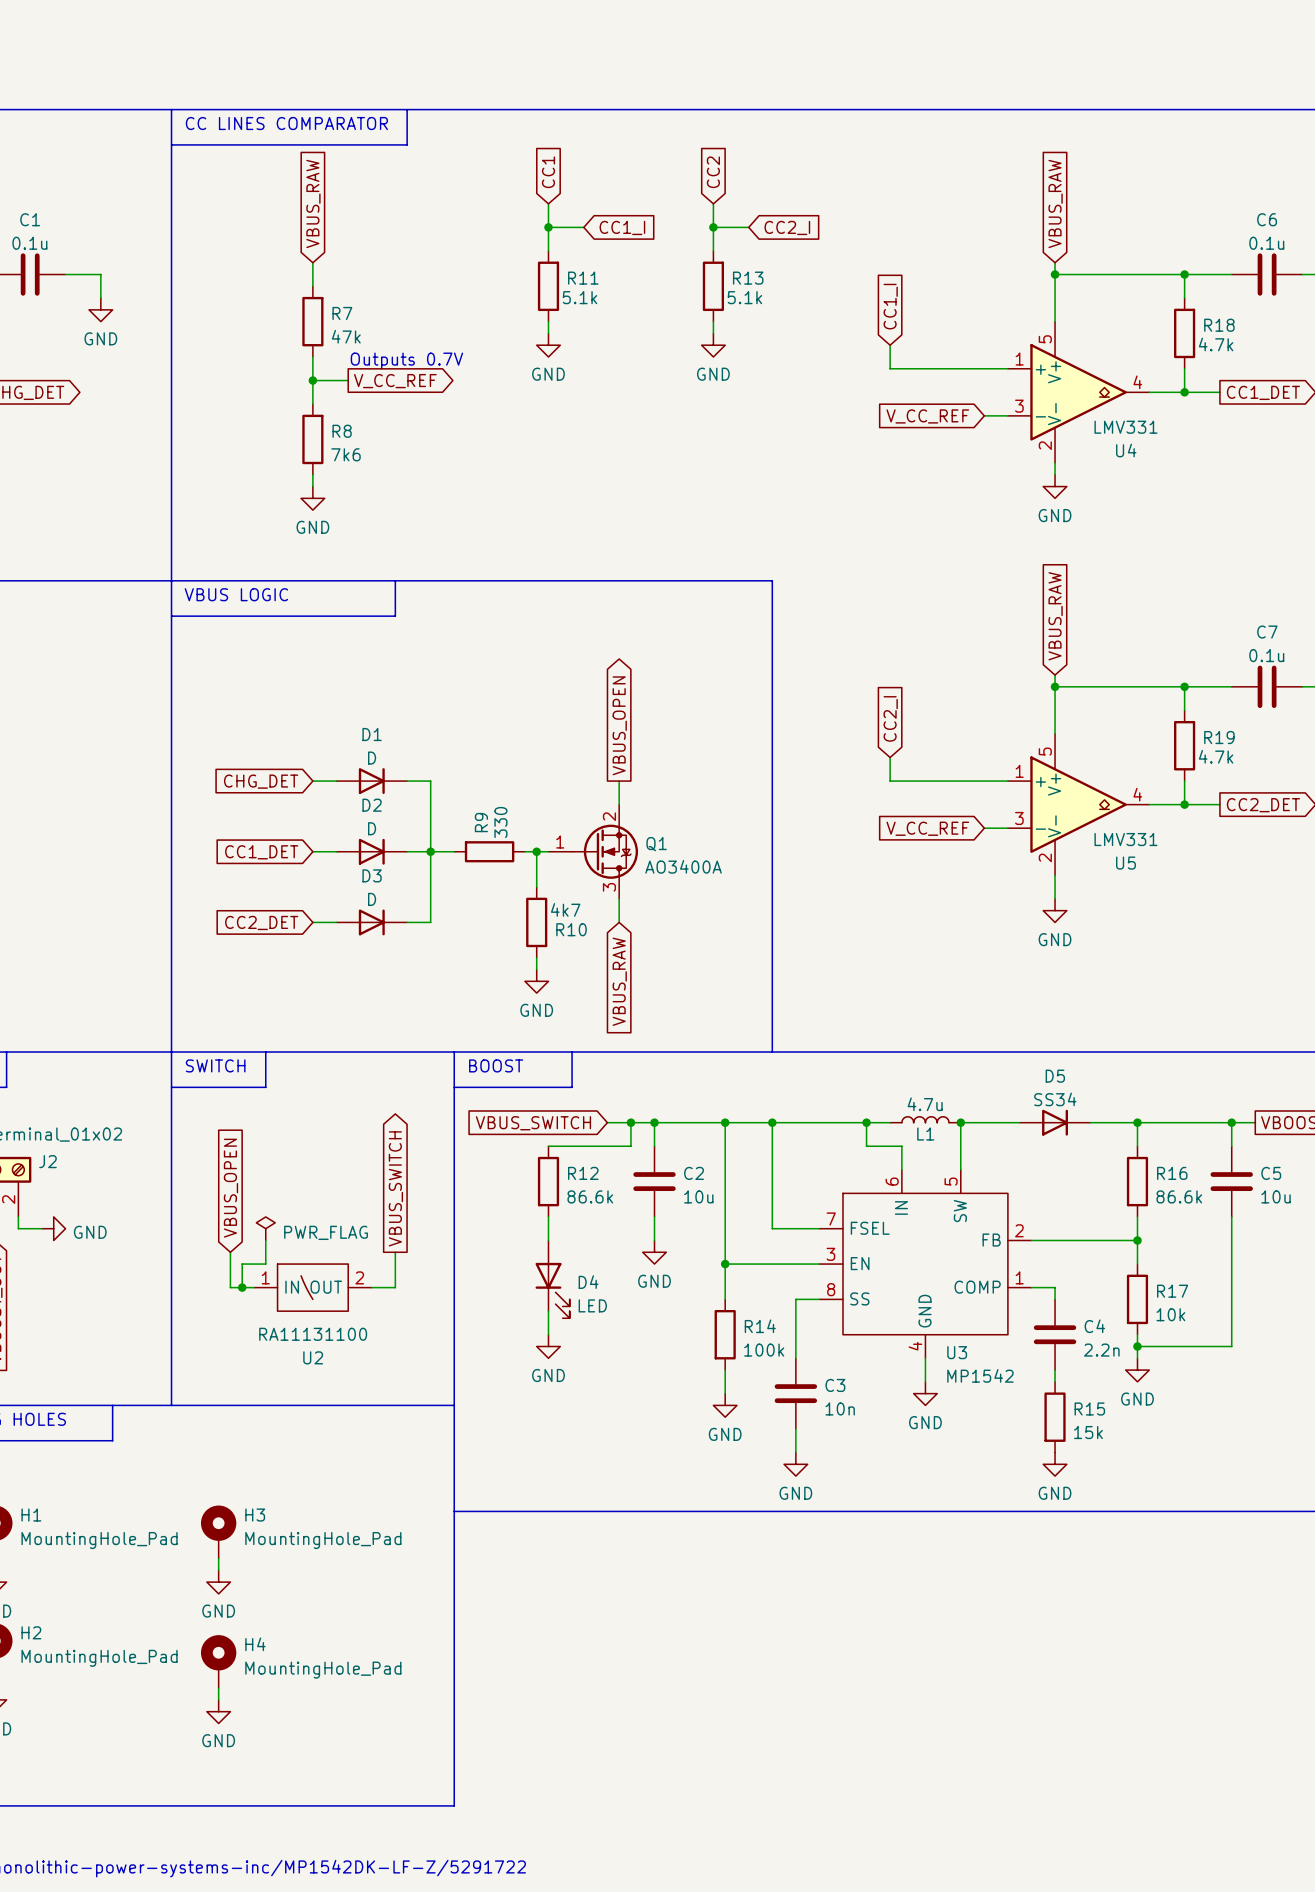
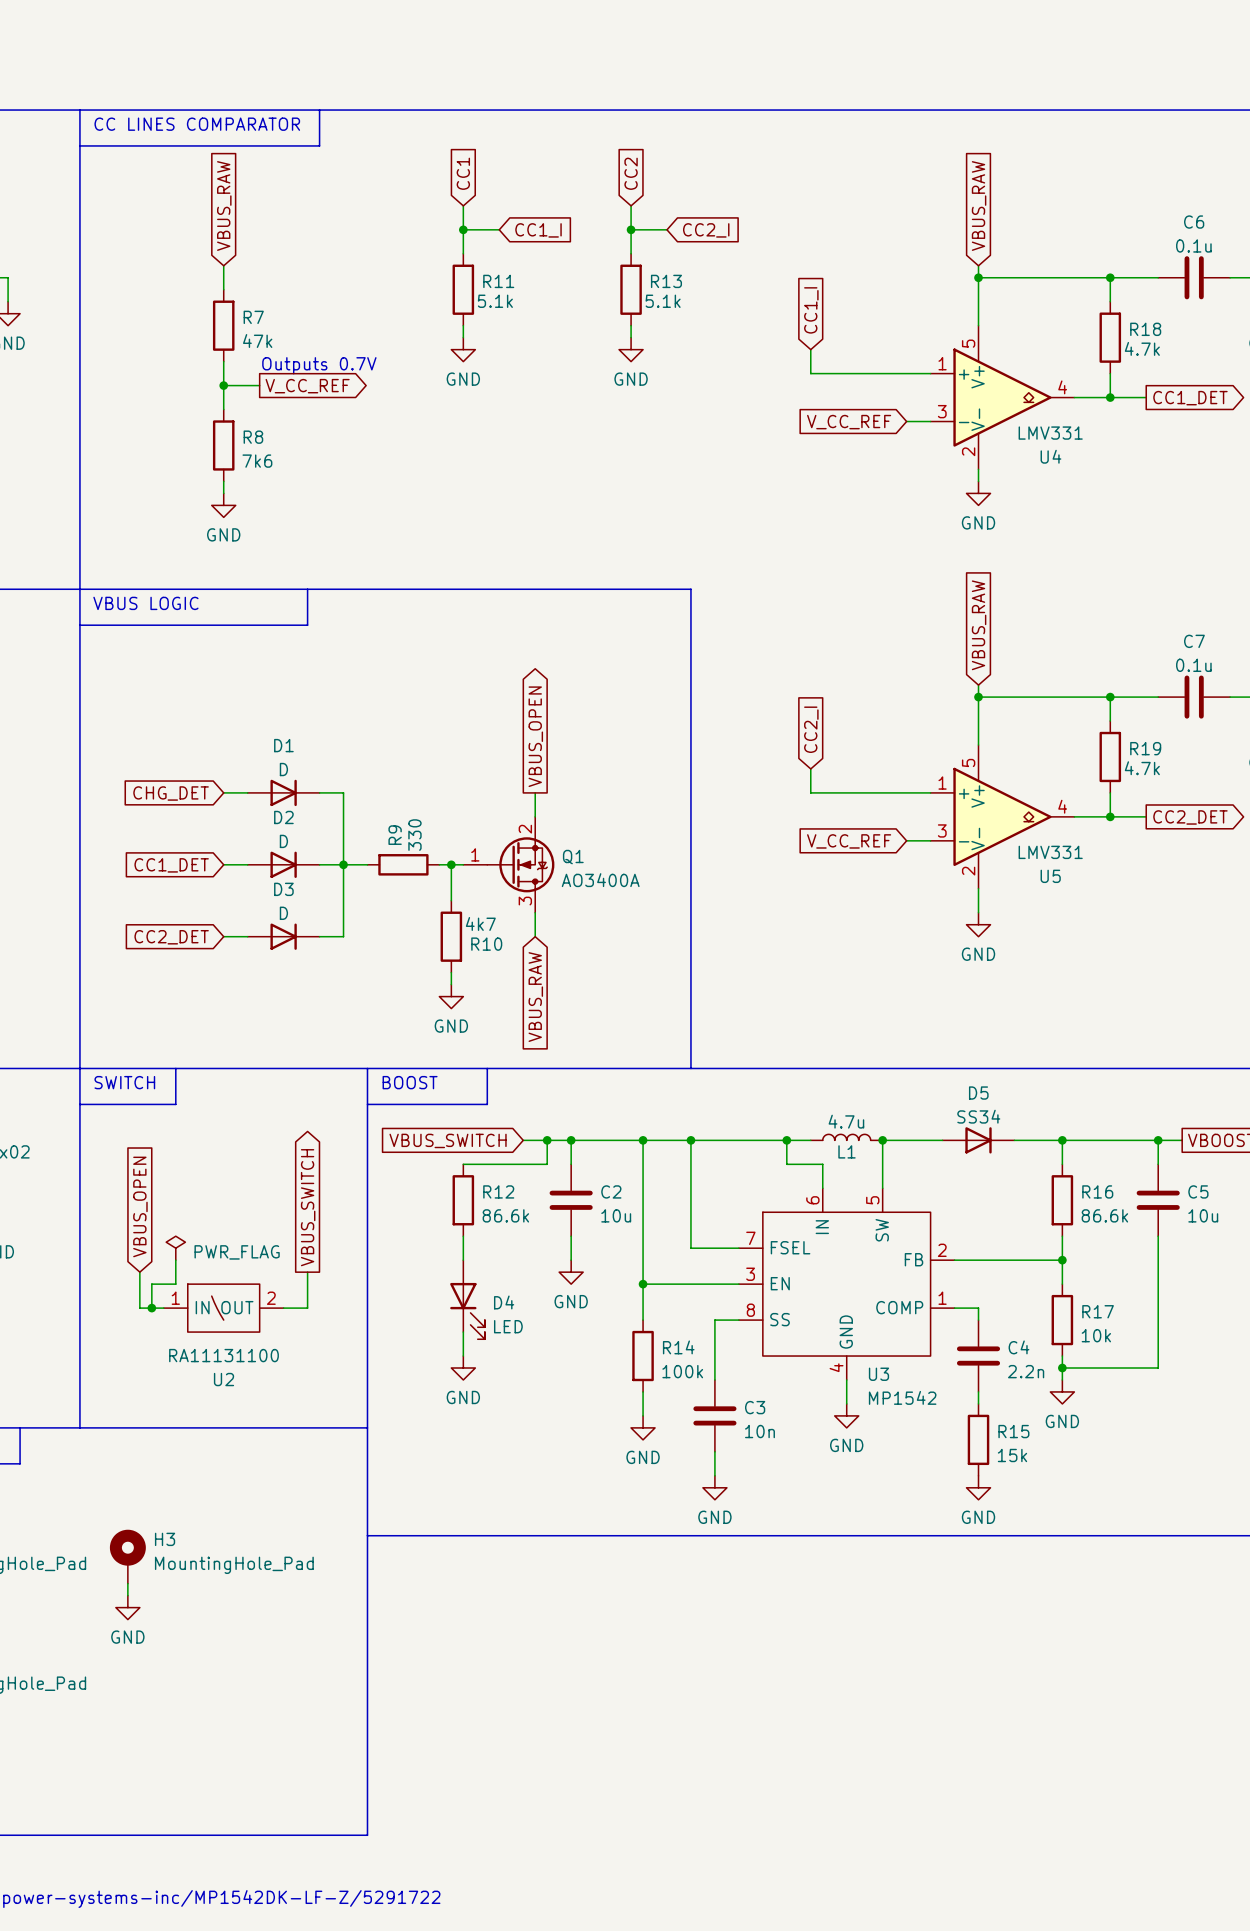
H4: MountingHole_Pad (218, 1661) -> none
wire: (218, 1688) (218, 1699) -> none
power symbol: GND (218, 1711) -> none

